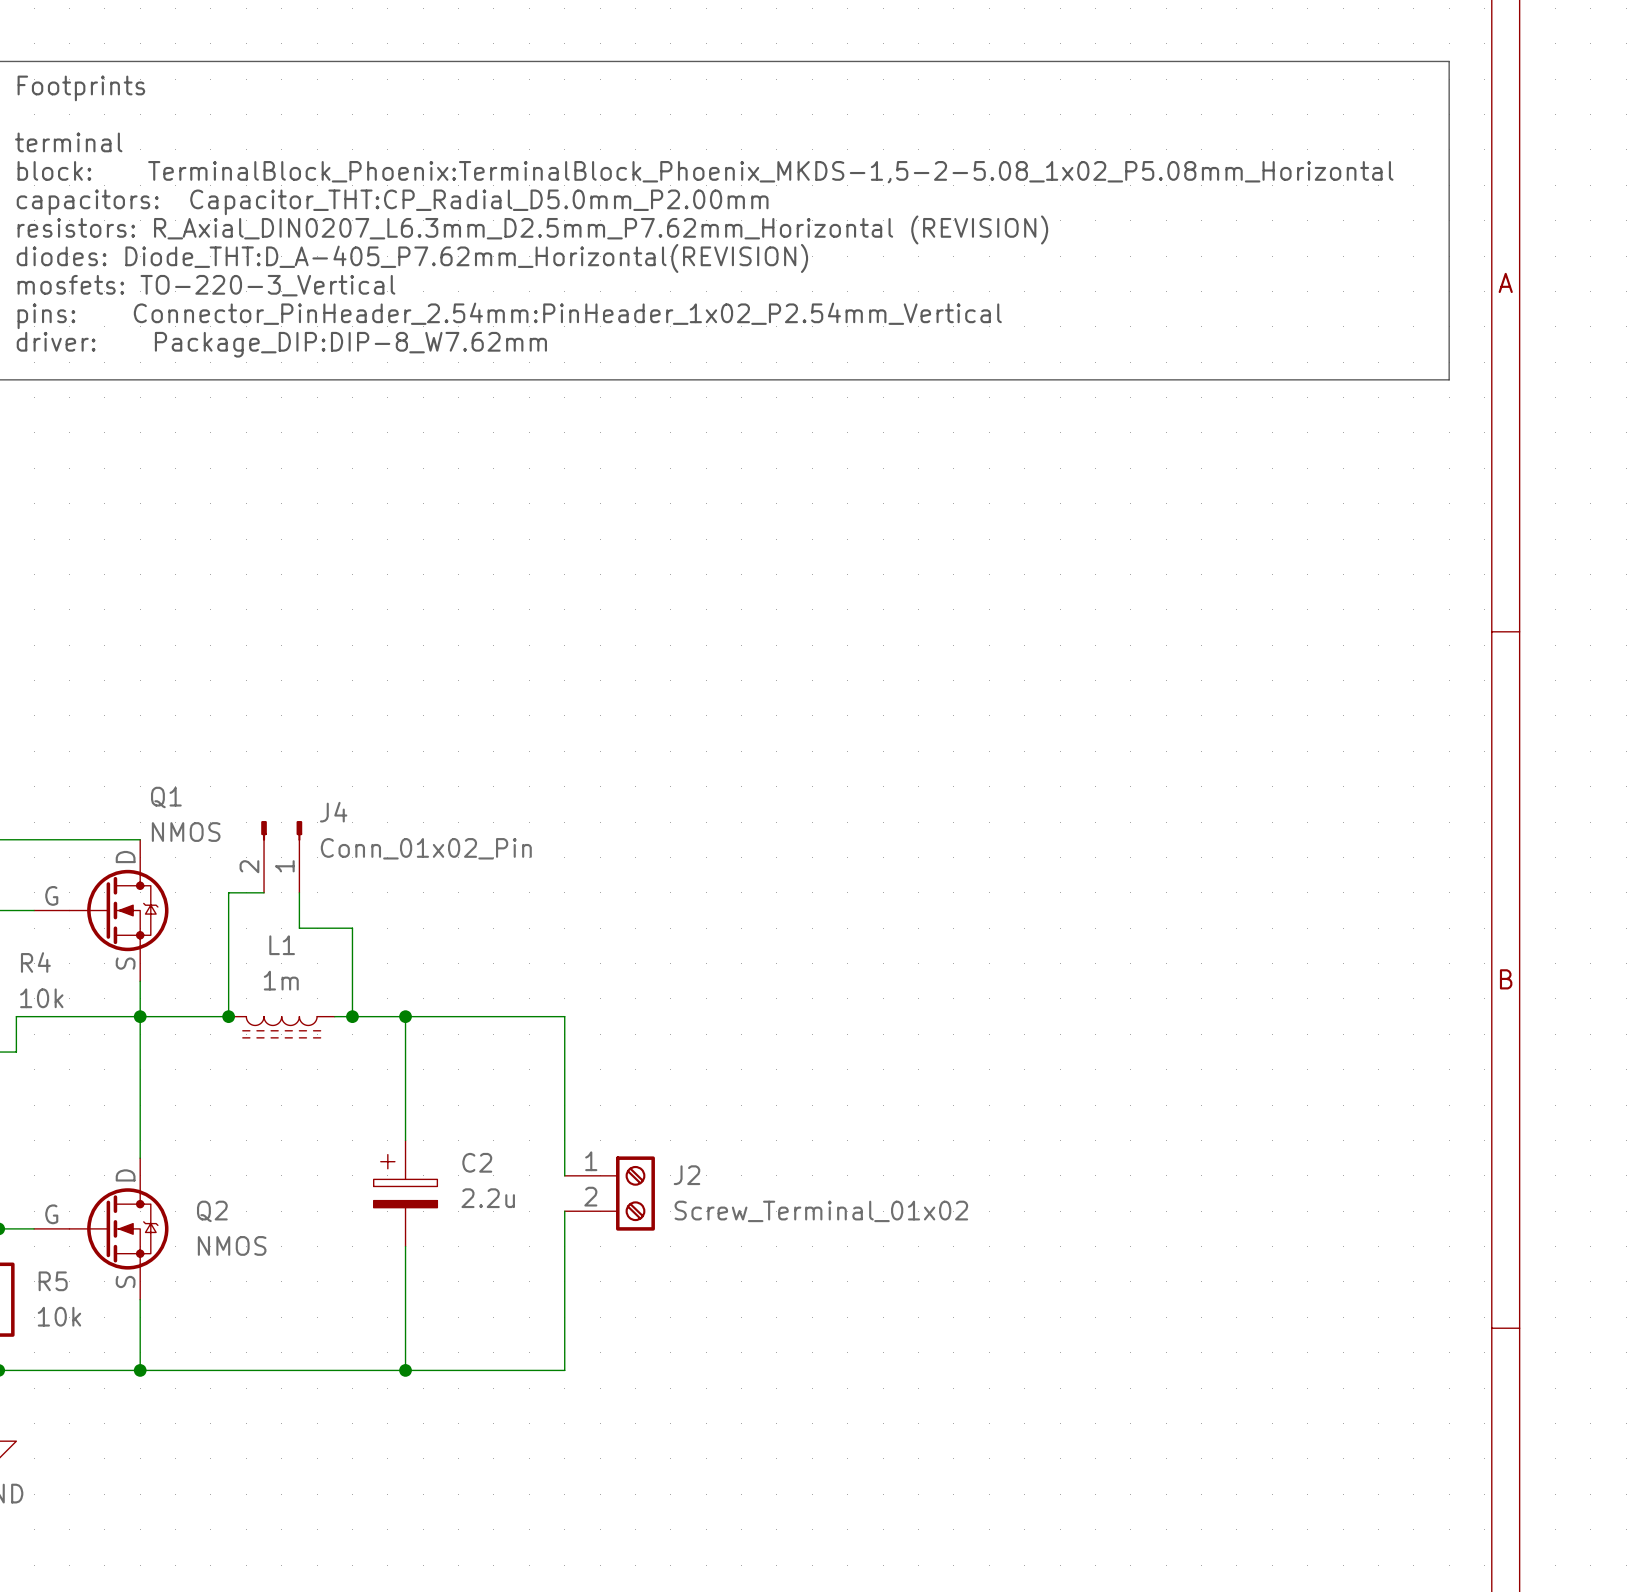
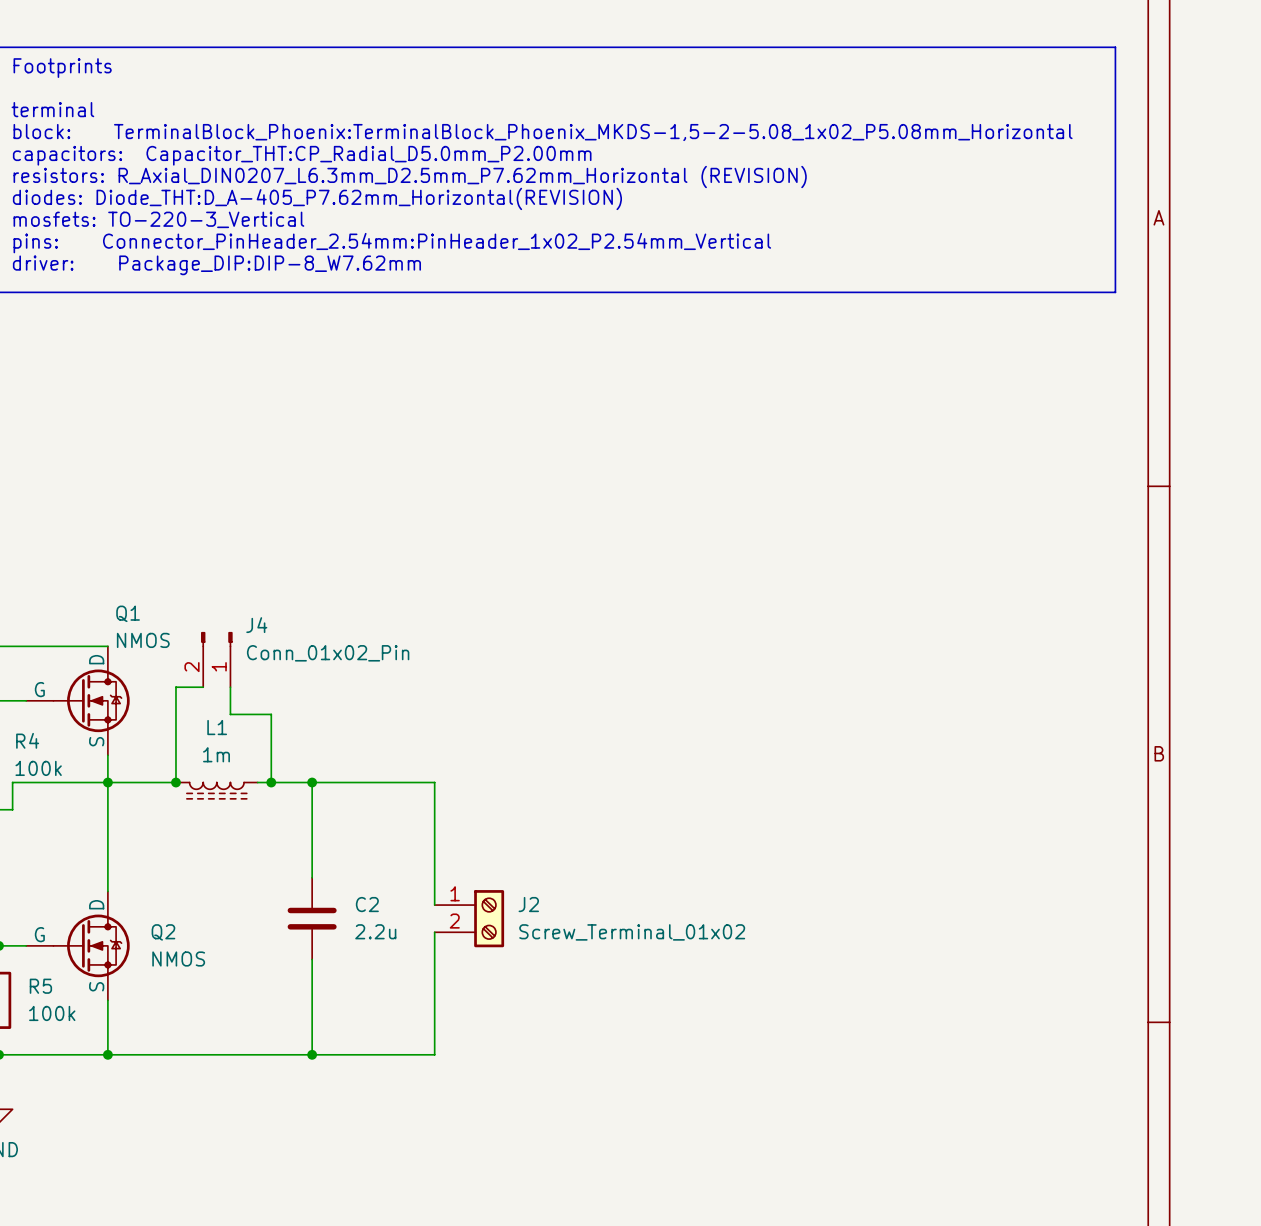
R4 value: 10k (41, 998) -> 100k (38, 768)
C2 symbol: [373, 1140, 438, 1247] -> [287, 877, 337, 960]
R5 value: 10k (59, 1316) -> 100k (52, 1013)

